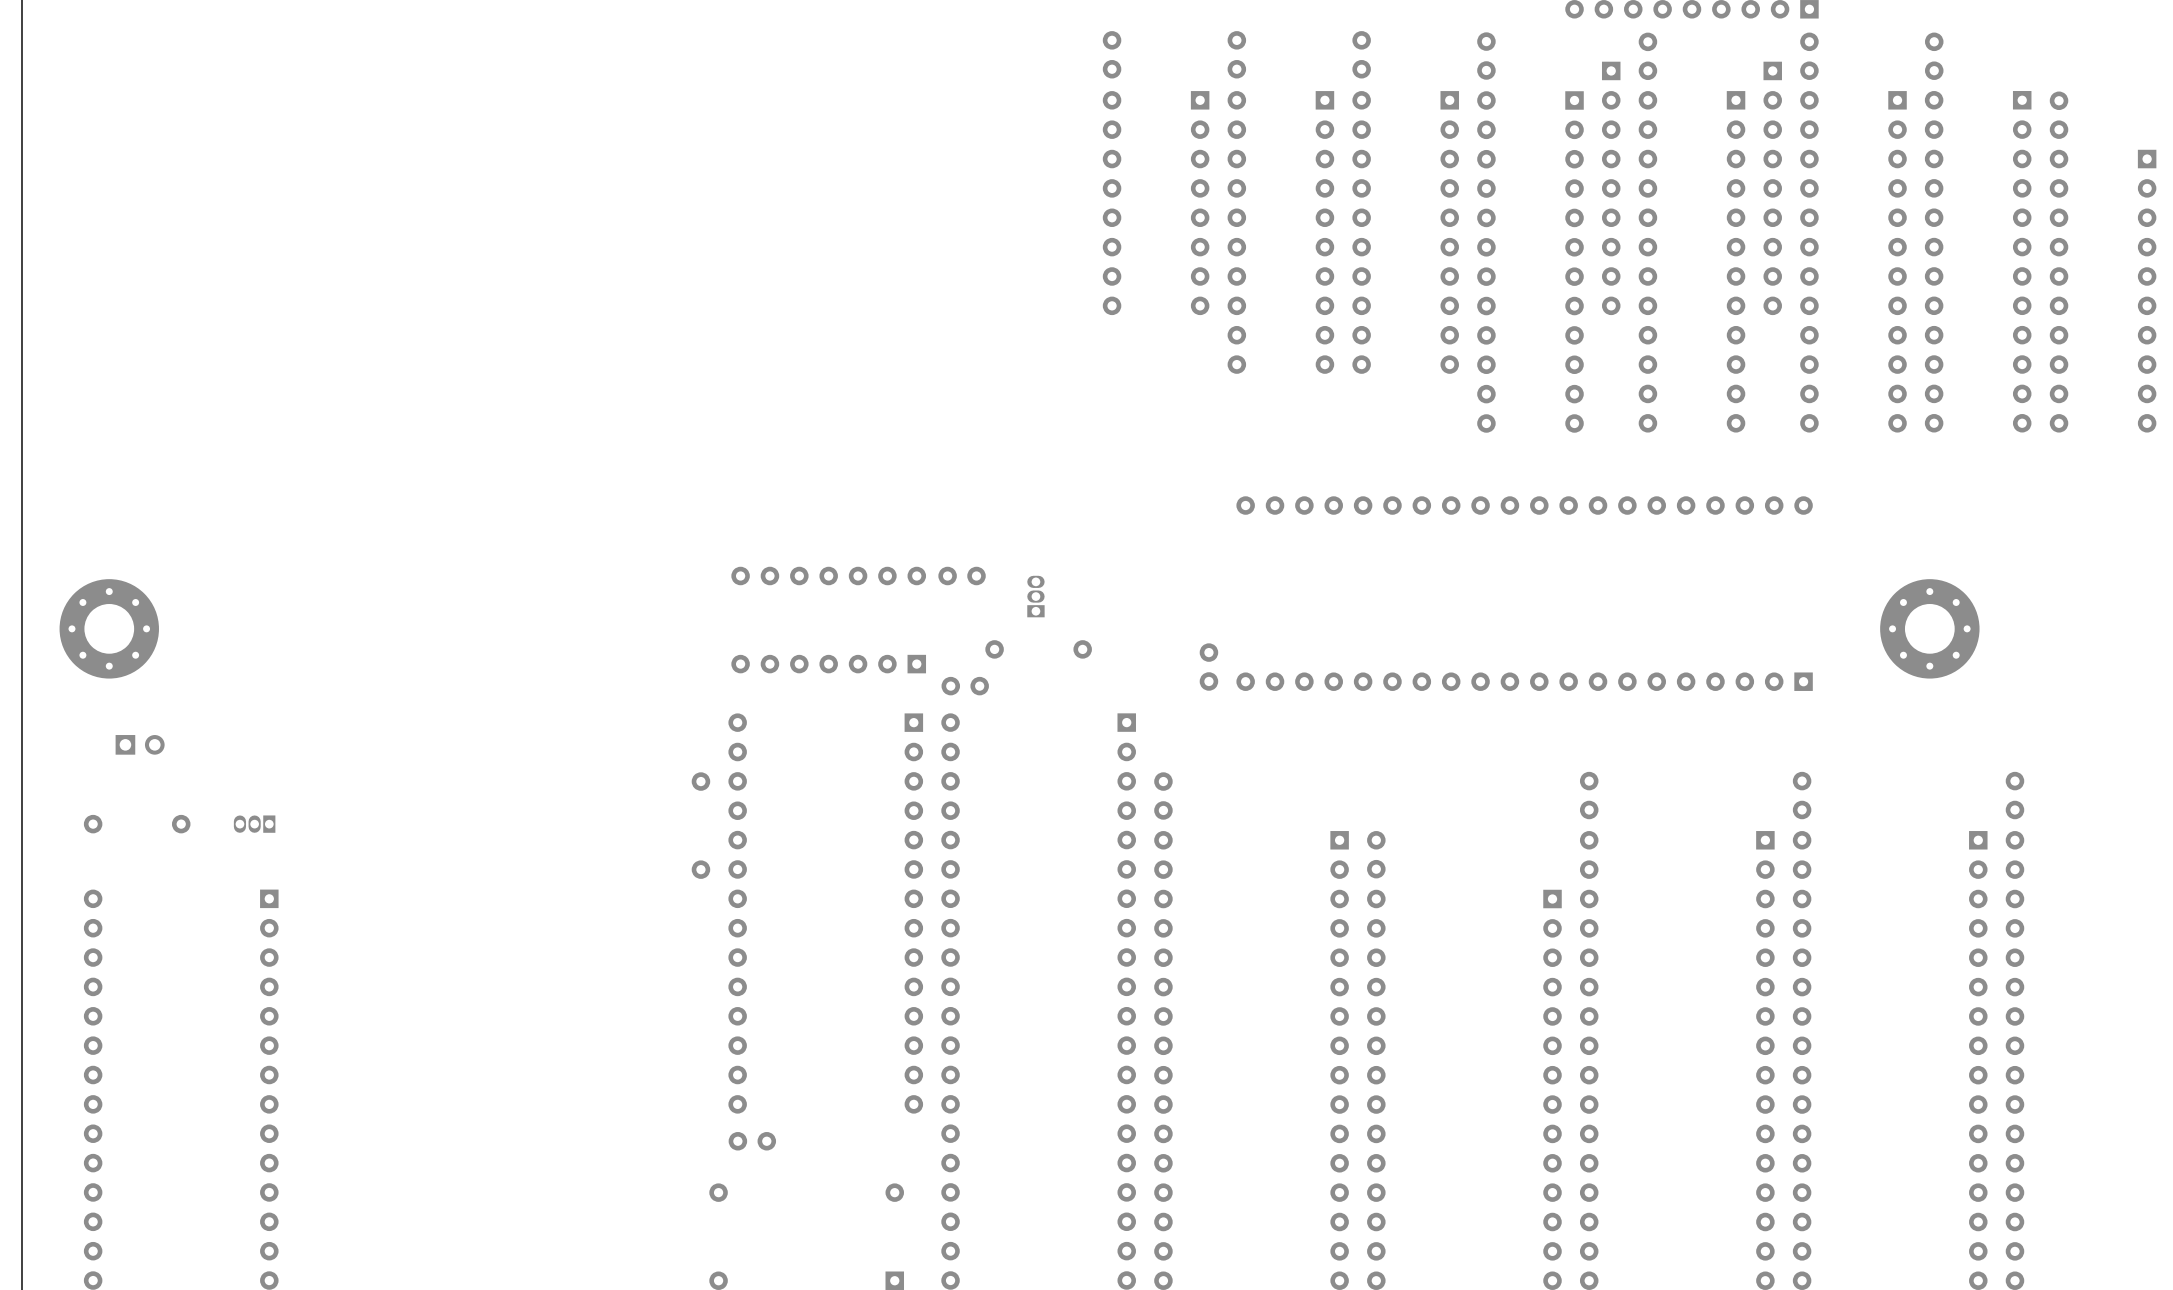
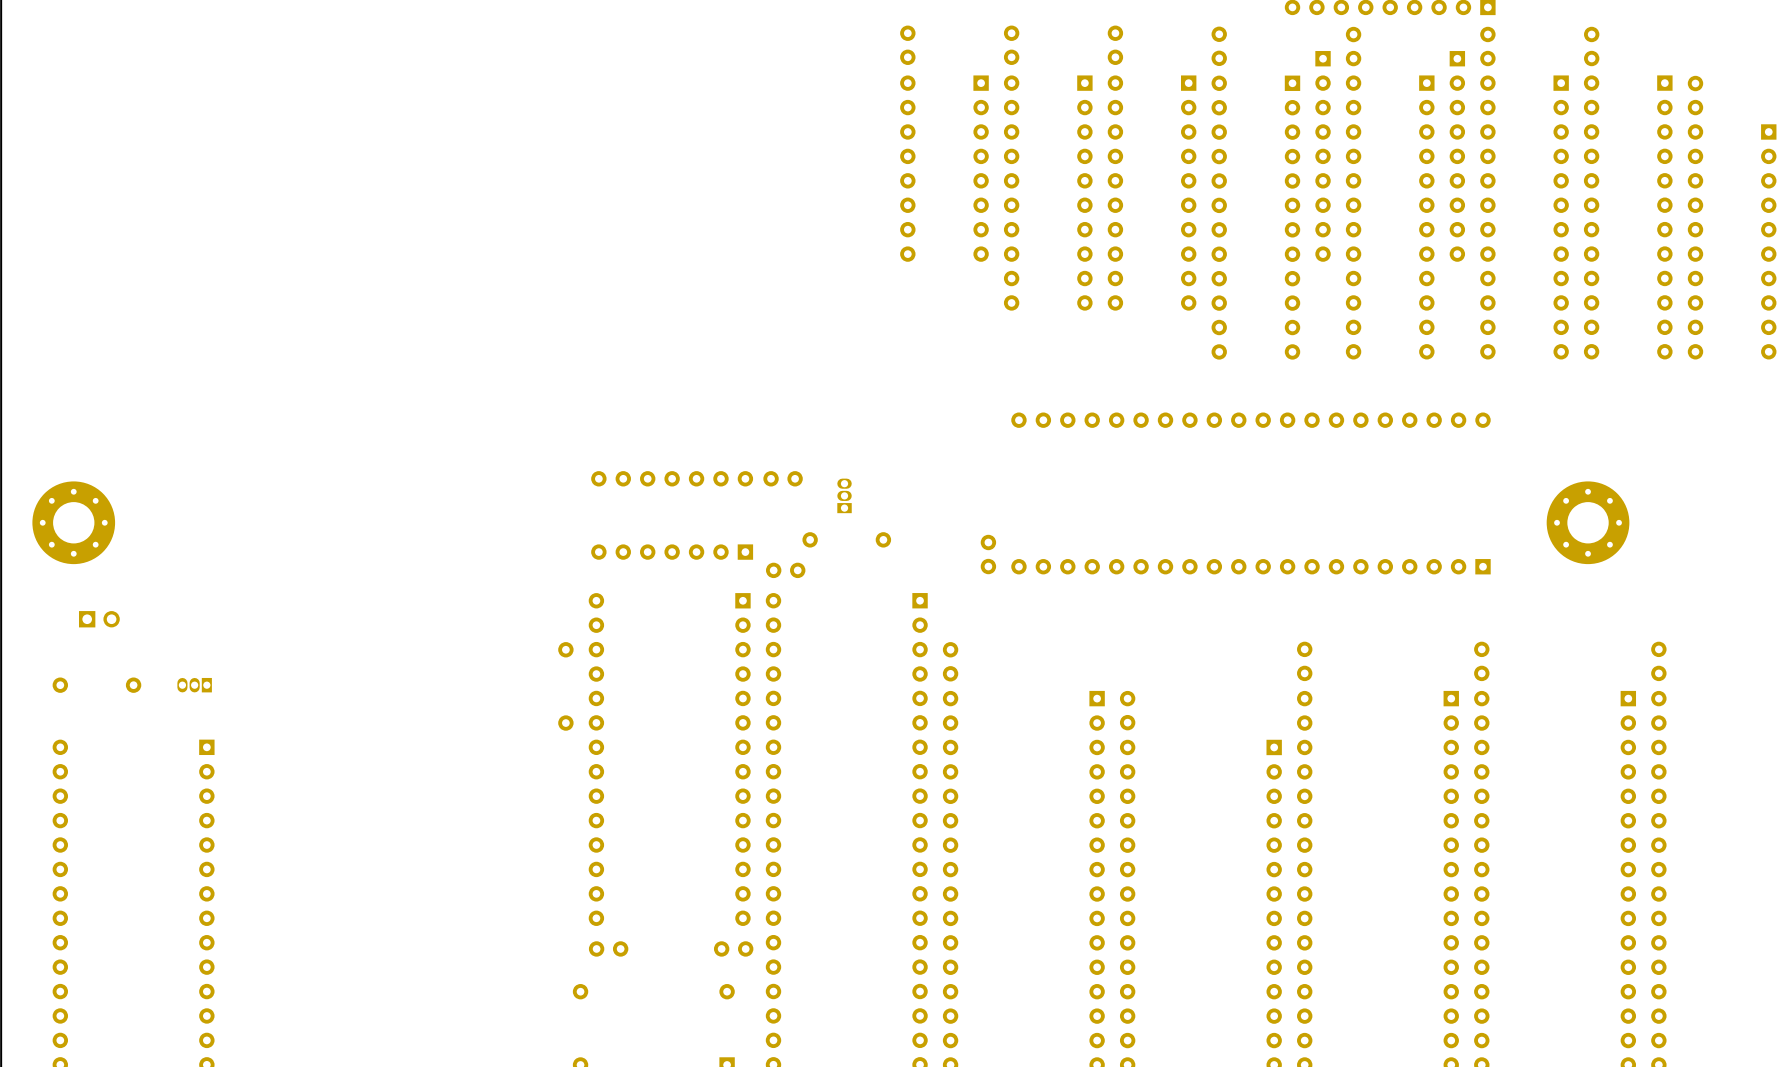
part: none -> (733, 948)

